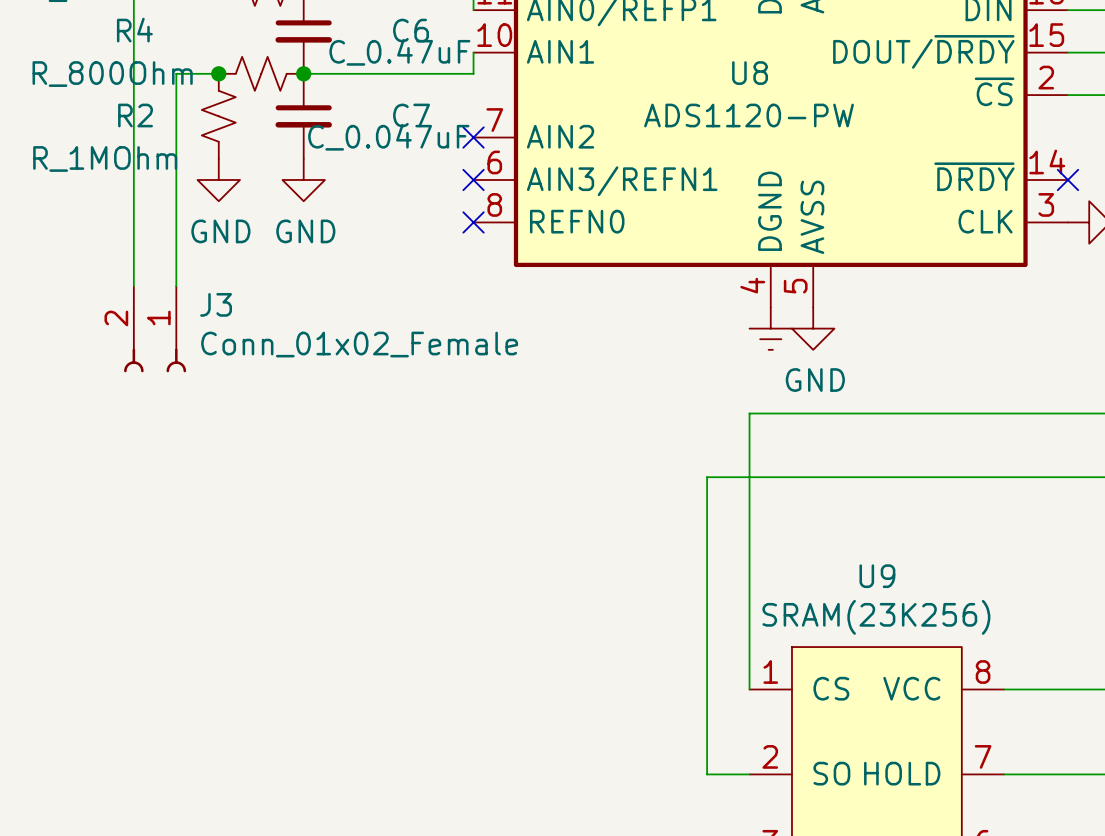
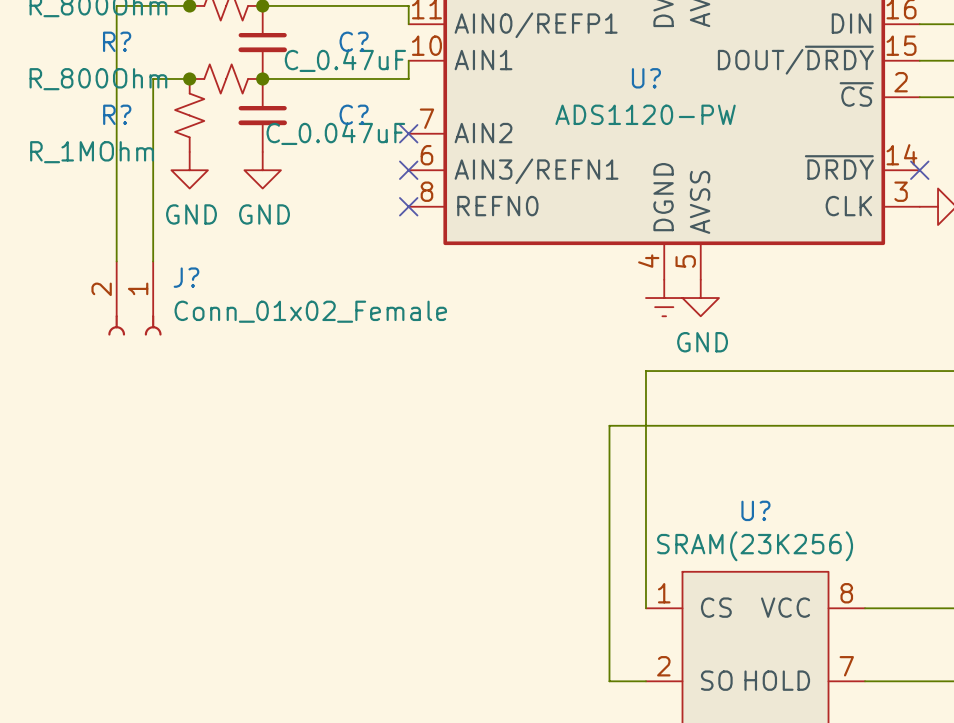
R4 name: R4 (134, 30) -> R? (117, 41)
C6 name: C6 (411, 30) -> C? (354, 41)
U8 name: U8 (750, 73) -> U? (646, 78)
R2 name: R2 (135, 115) -> R? (117, 114)
C7 name: C7 (411, 115) -> C? (354, 114)
J3 name: J3 (216, 304) -> J? (186, 277)
U9 name: U9 (877, 576) -> U? (755, 510)

